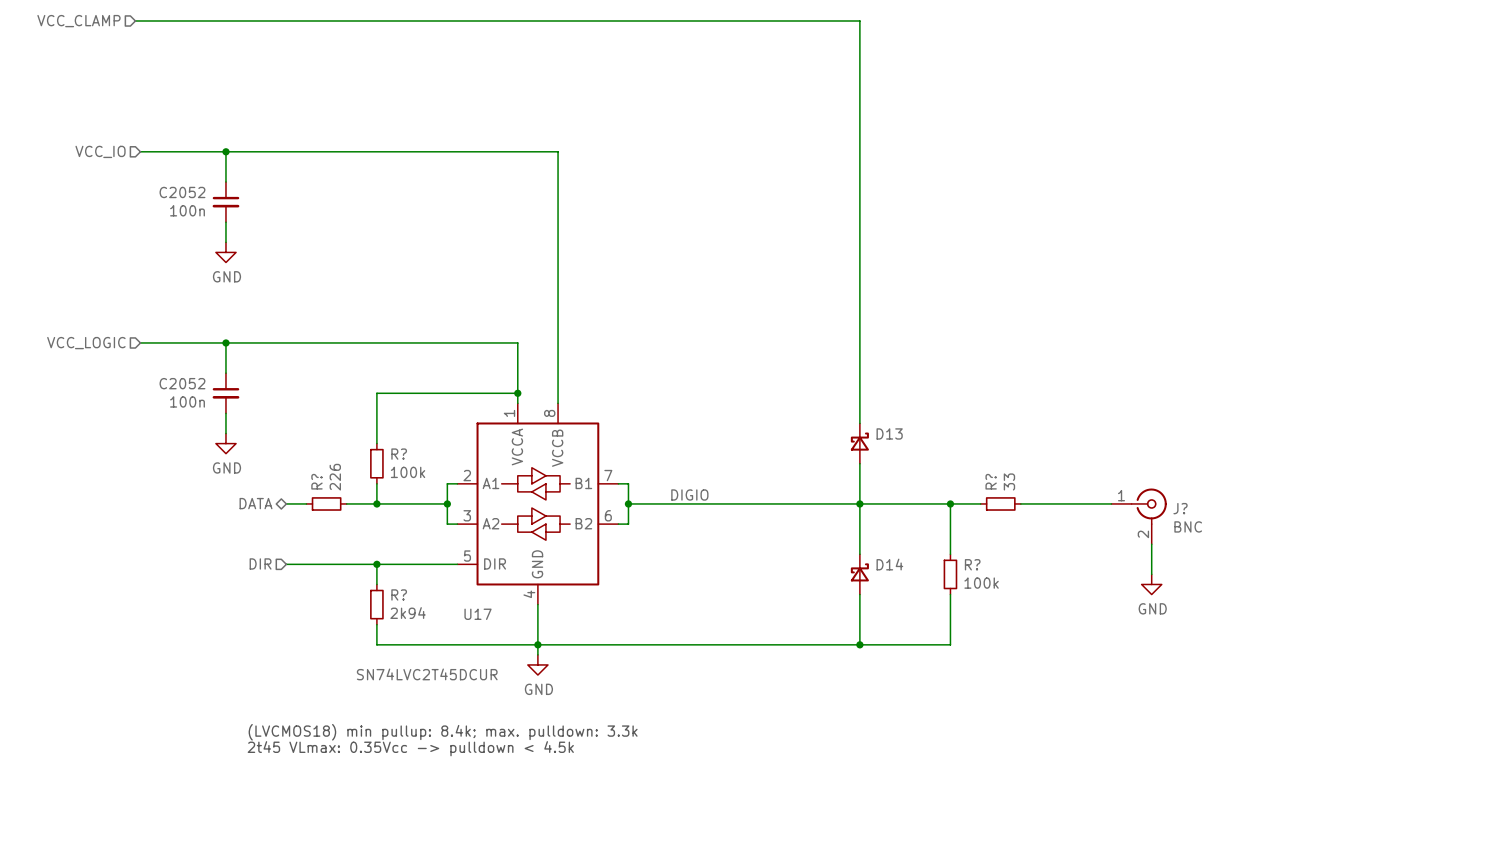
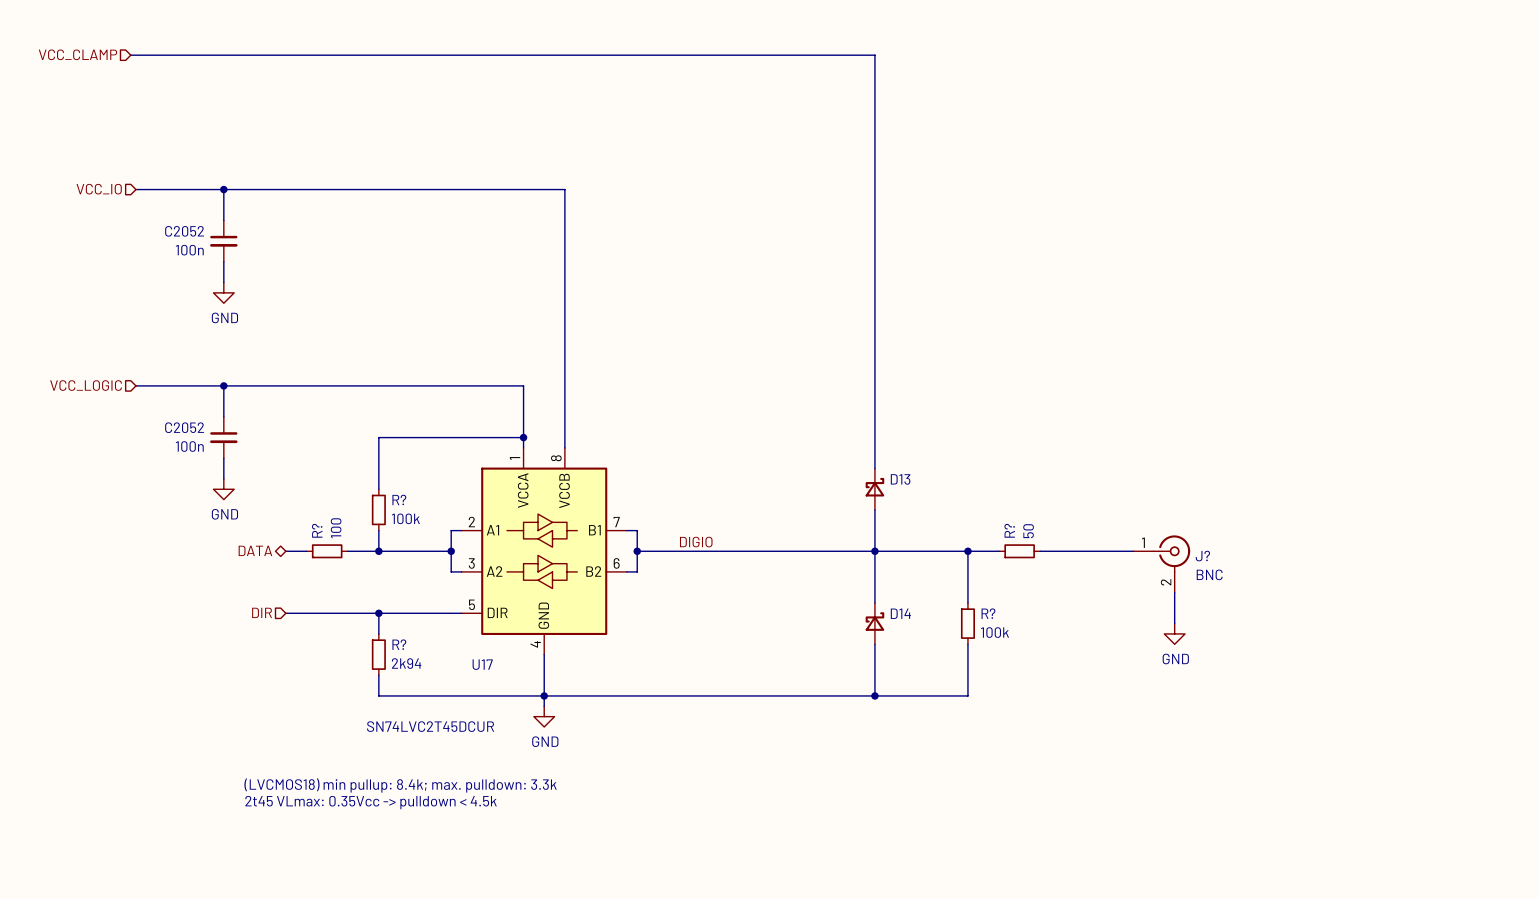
R? value: 226 (335, 477) -> 100 (336, 528)
R? value: 33 (1009, 481) -> 50 (1028, 531)

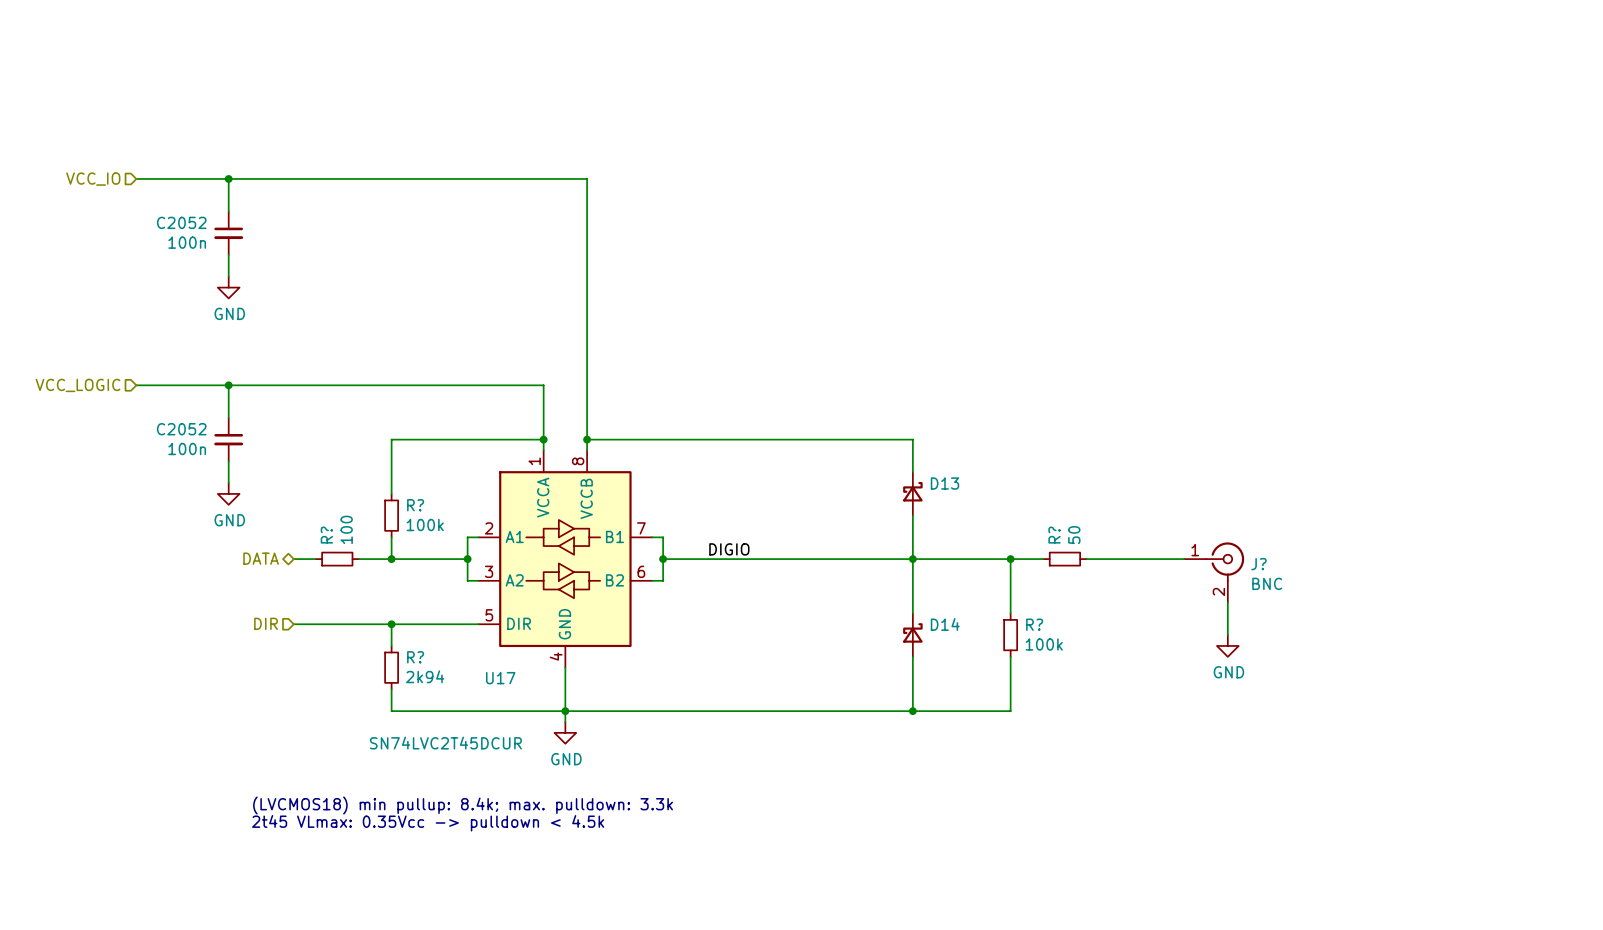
hierarchical label: VCC_CLAMP (77, 54) -> none
wire: (130, 55) (874, 55) (874, 437) -> (587, 439) (912, 439)
junction: none -> (587, 439)

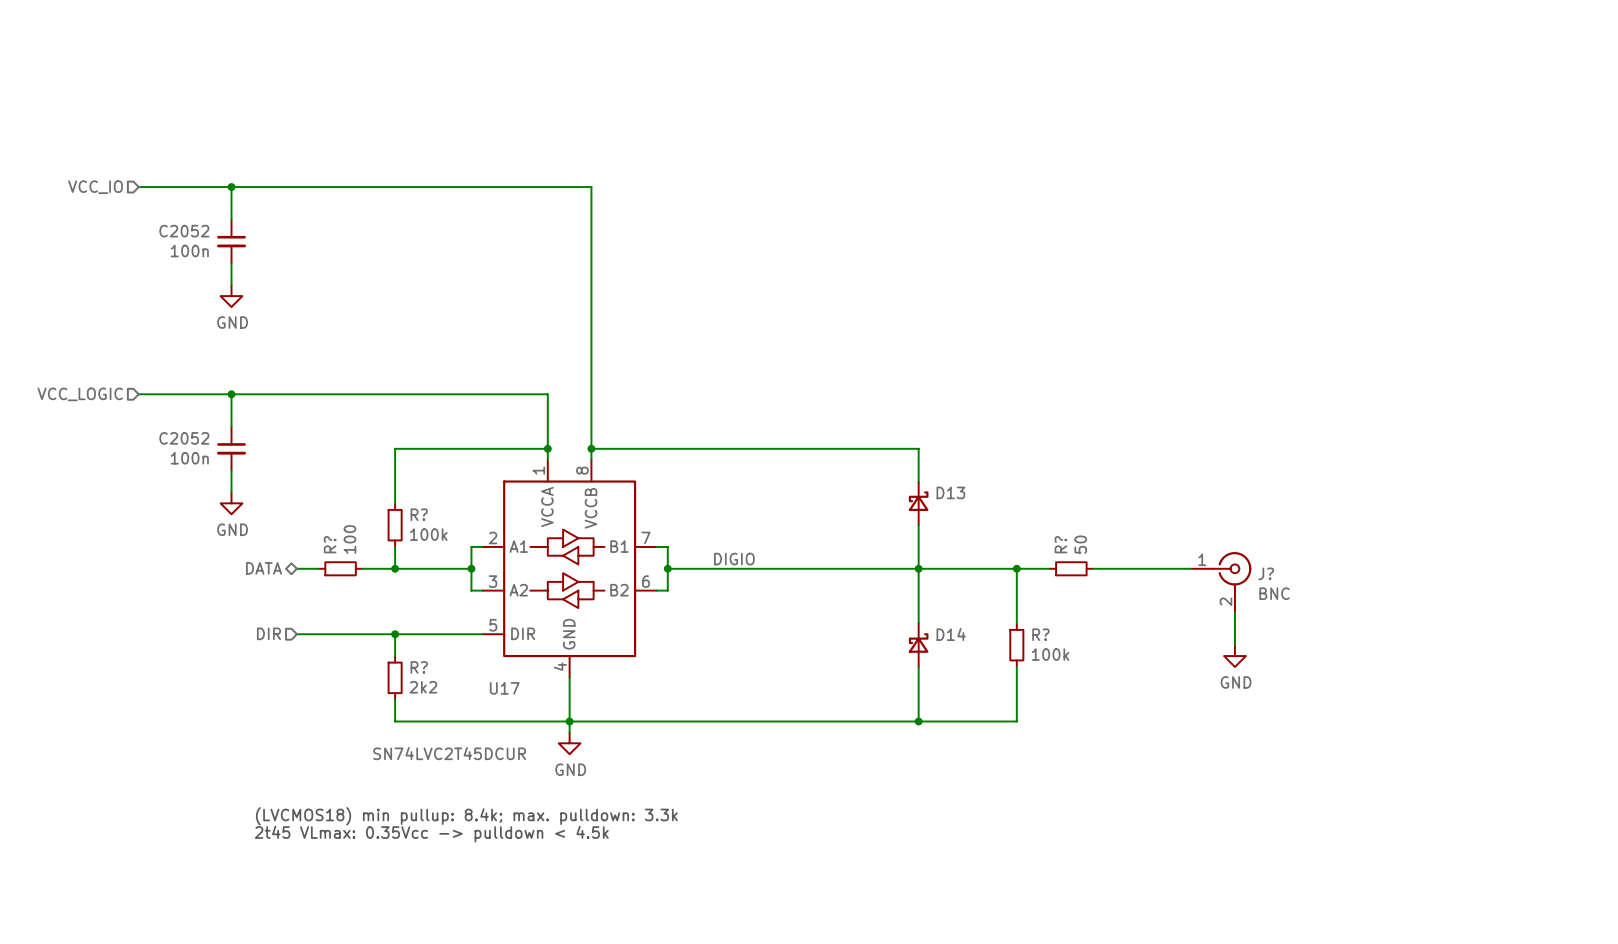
R? value: 2k94 (425, 676) -> 2k2 (423, 687)

